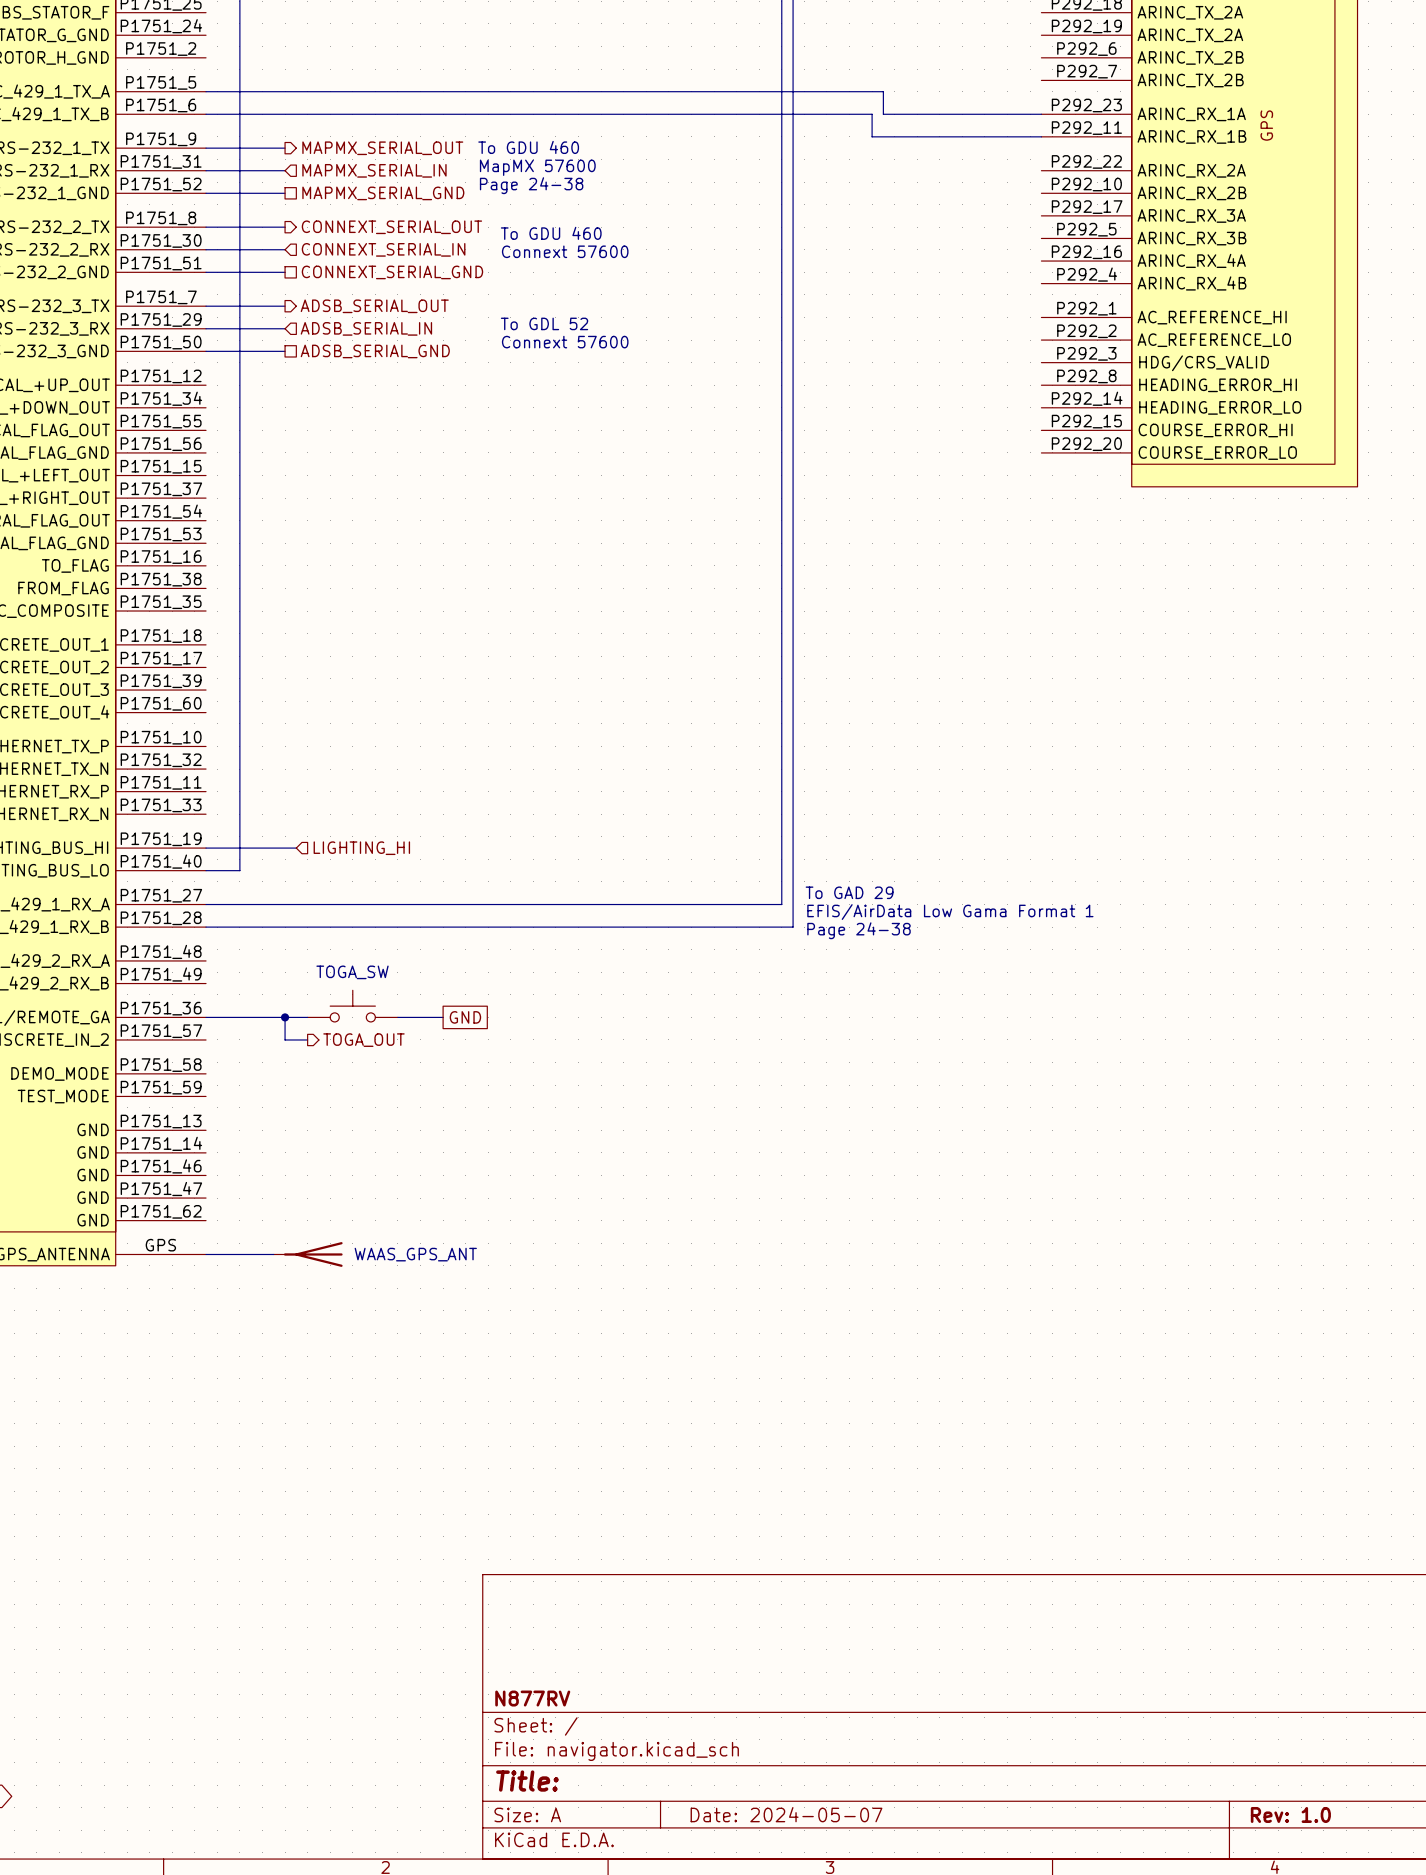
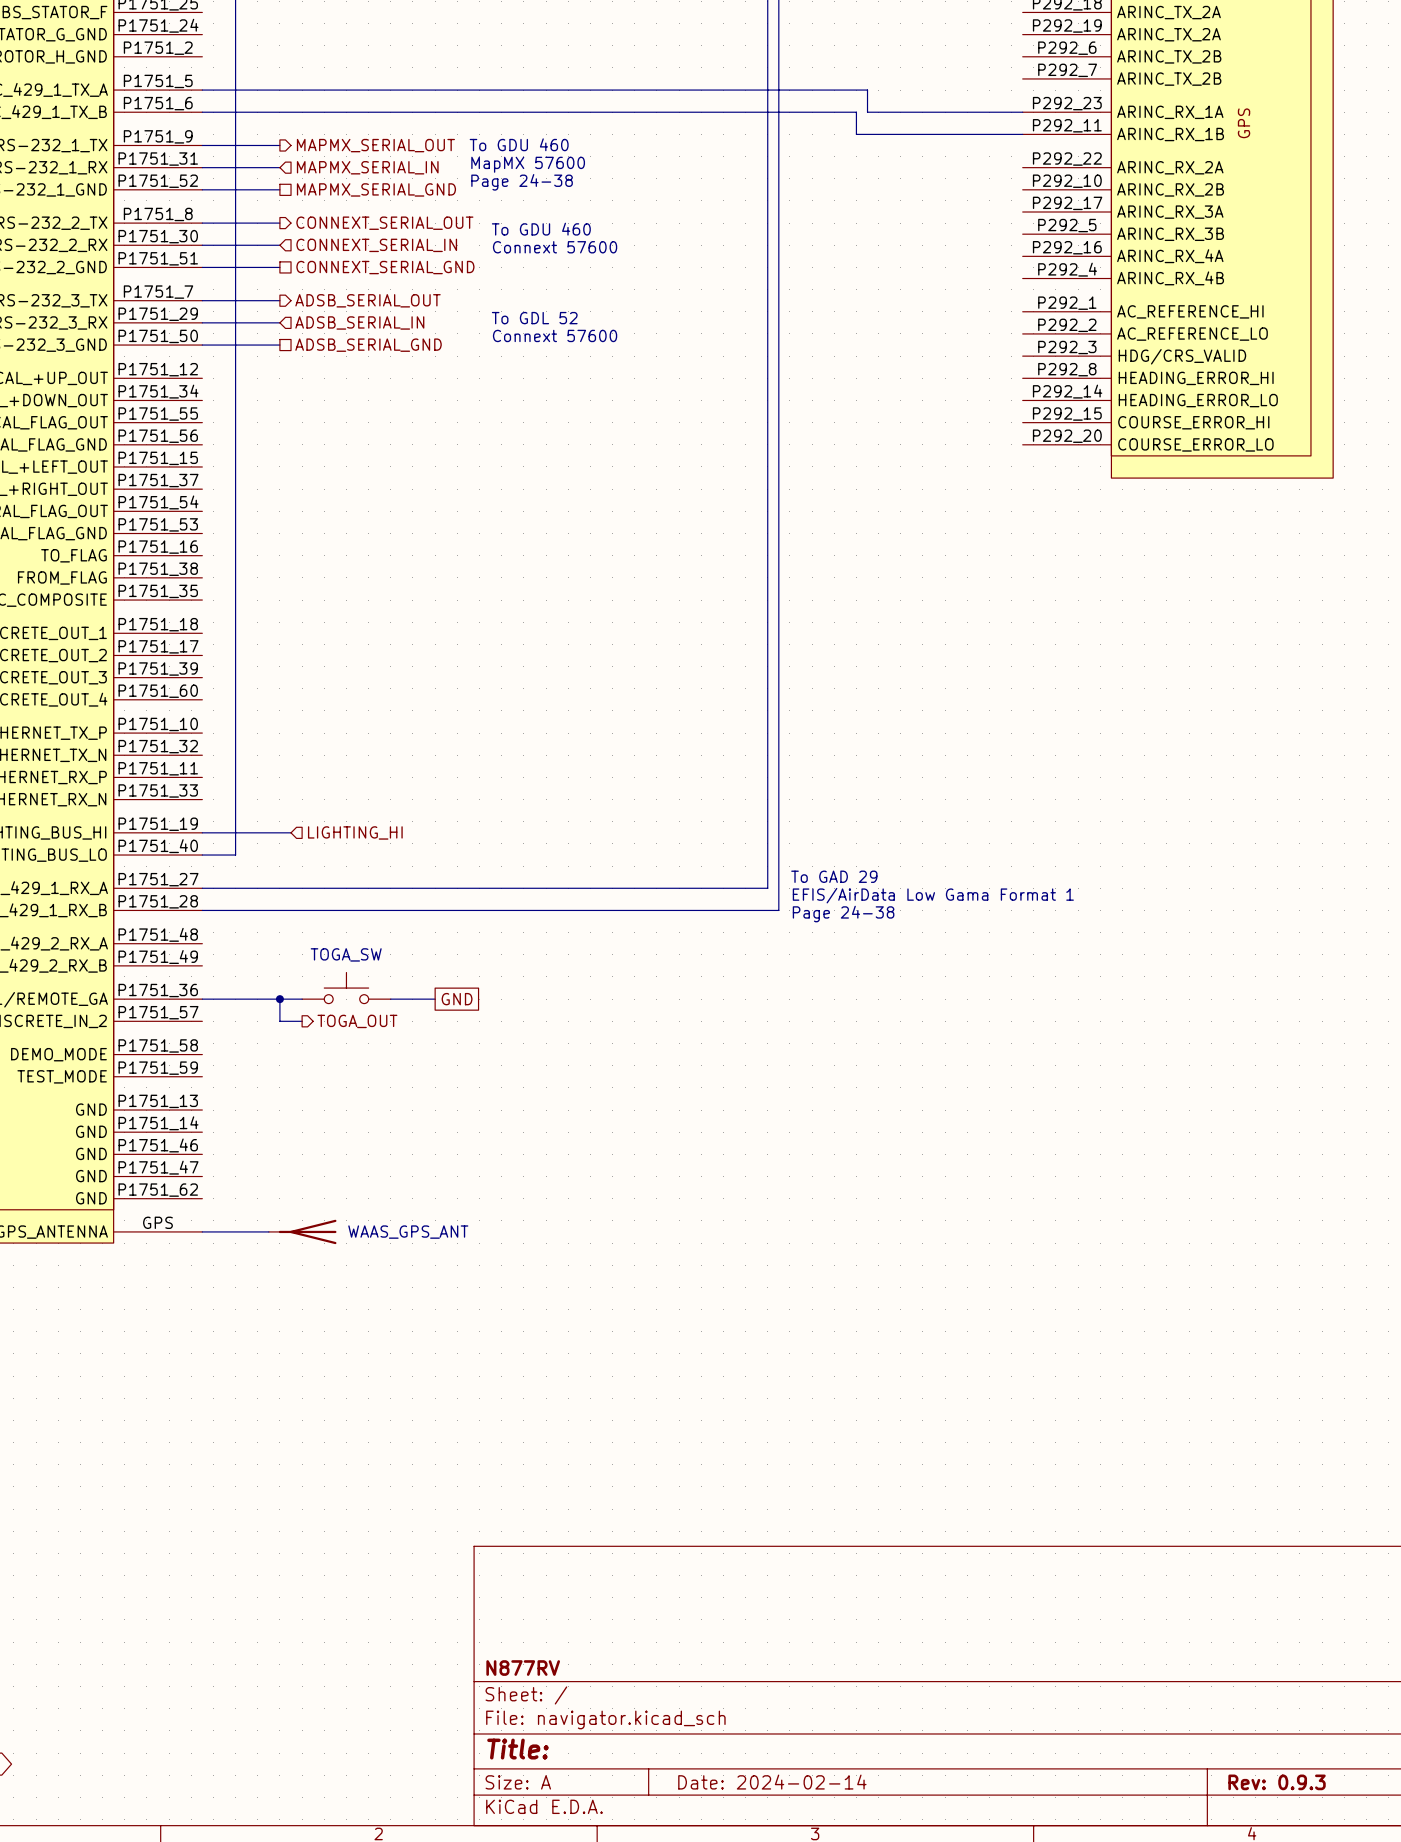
title block: Date: 2024-05-07 (786, 1814) -> Date: 2024-02-14 (772, 1782)
title block: Rev: 1.0 (1290, 1814) -> Rev: 0.9.3 (1277, 1782)

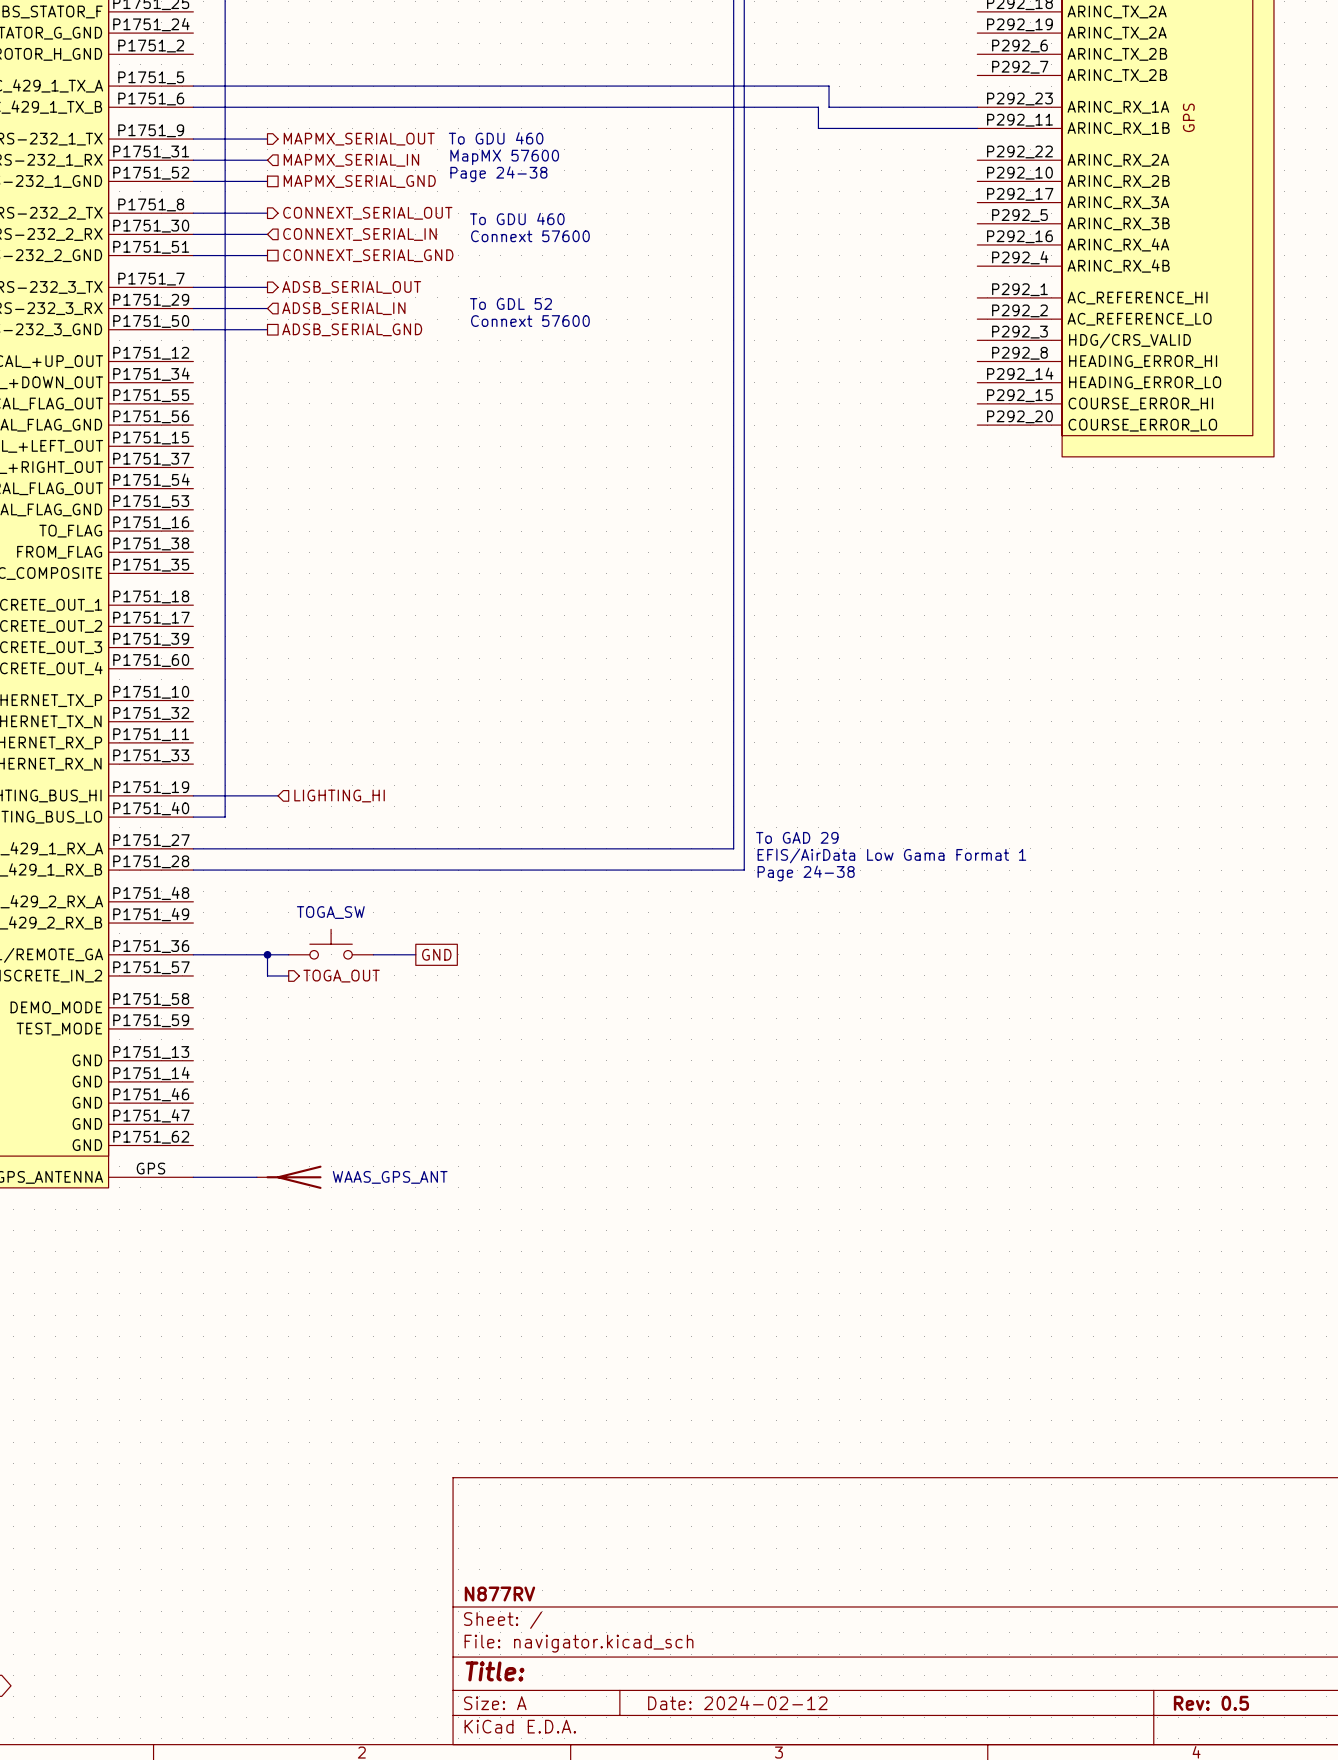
title block: Date: 2024-02-14 (772, 1782) -> Date: 2024-02-12 (737, 1702)
title block: Rev: 0.9.3 (1277, 1782) -> Rev: 0.5 (1211, 1703)

